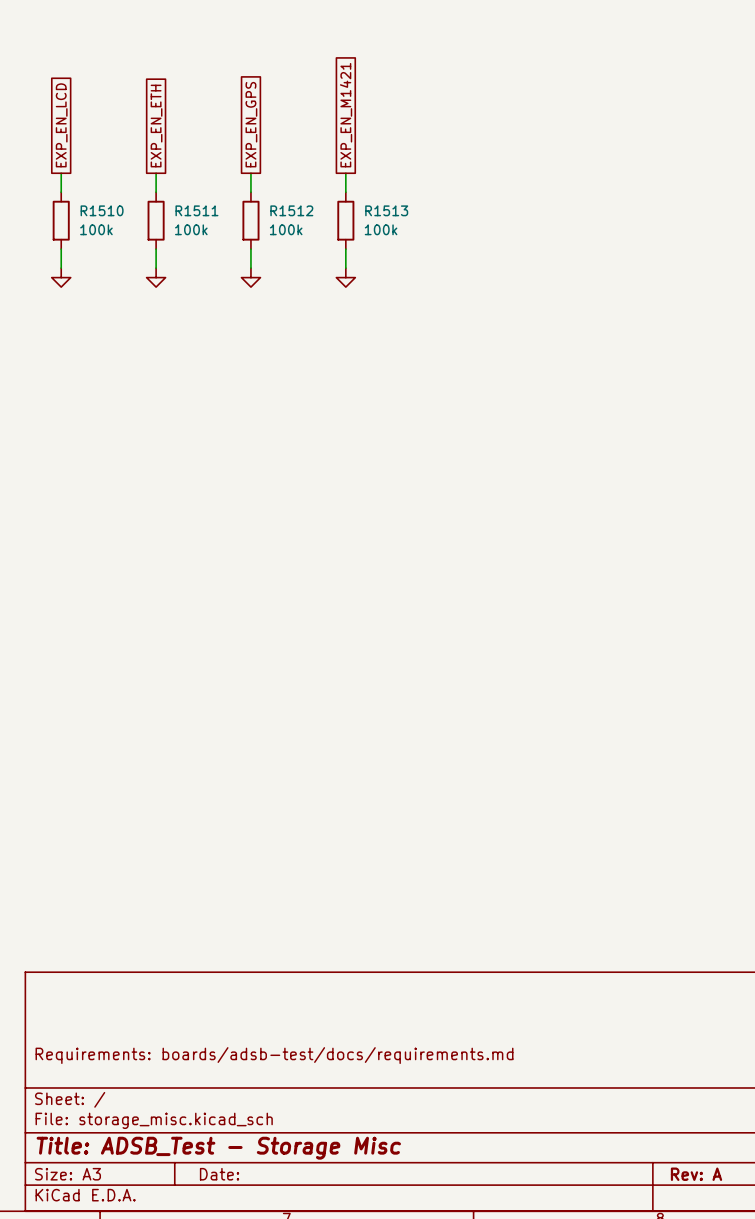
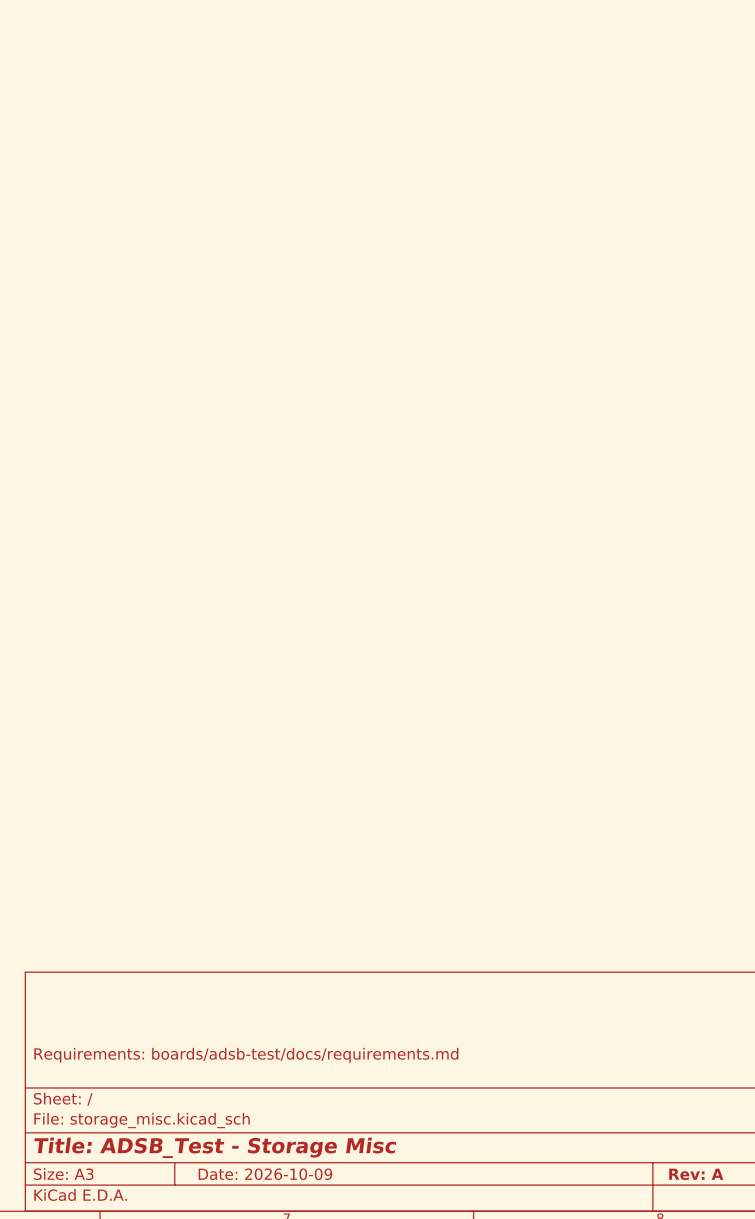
global label: EXP_EN_M1421 (346, 115) -> none
global label: EXP_EN_GPS (251, 124) -> none
global label: EXP_EN_LCD (61, 125) -> none
global label: EXP_EN_ETH (156, 126) -> none
wire: (61, 173) (61, 192) -> none
wire: (156, 173) (156, 192) -> none
wire: (250, 173) (250, 192) -> none
wire: (345, 173) (345, 192) -> none
R1510: 100k (61, 220) -> none
R1511: 100k (156, 220) -> none
R1512: 100k (250, 220) -> none
R1513: 100k (345, 220) -> none
wire: (61, 249) (61, 268) -> none
wire: (156, 249) (156, 268) -> none
wire: (250, 249) (250, 268) -> none
wire: (345, 249) (345, 268) -> none
power symbol: (61, 277) -> none
power symbol: (156, 277) -> none
power symbol: (250, 277) -> none
power symbol: (345, 277) -> none
title block: Date: (219, 1174) -> Date: 2026-10-09 (265, 1174)

